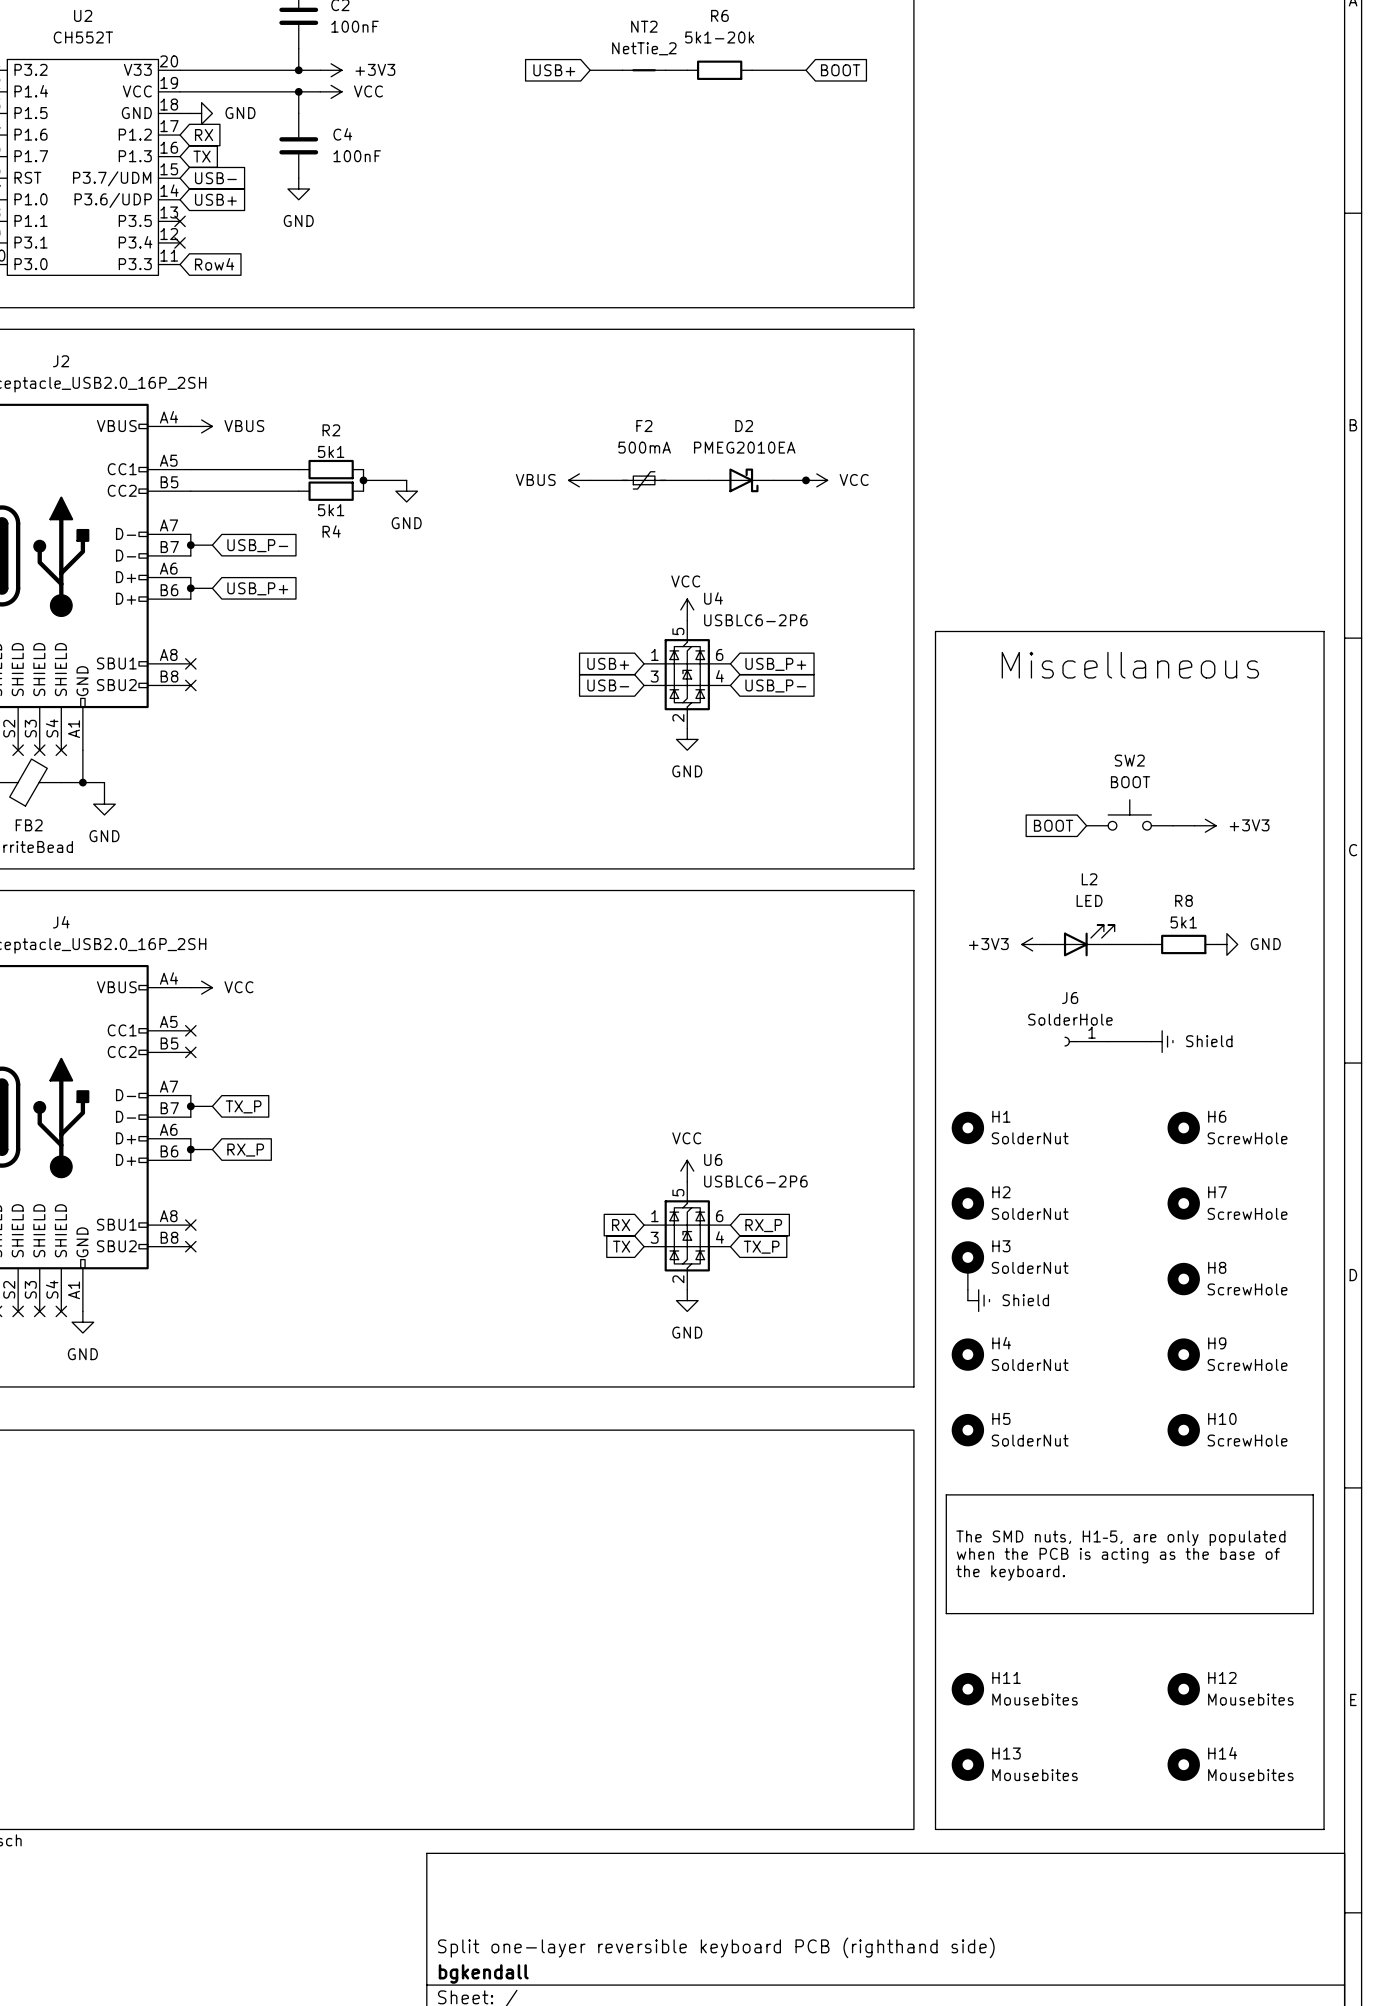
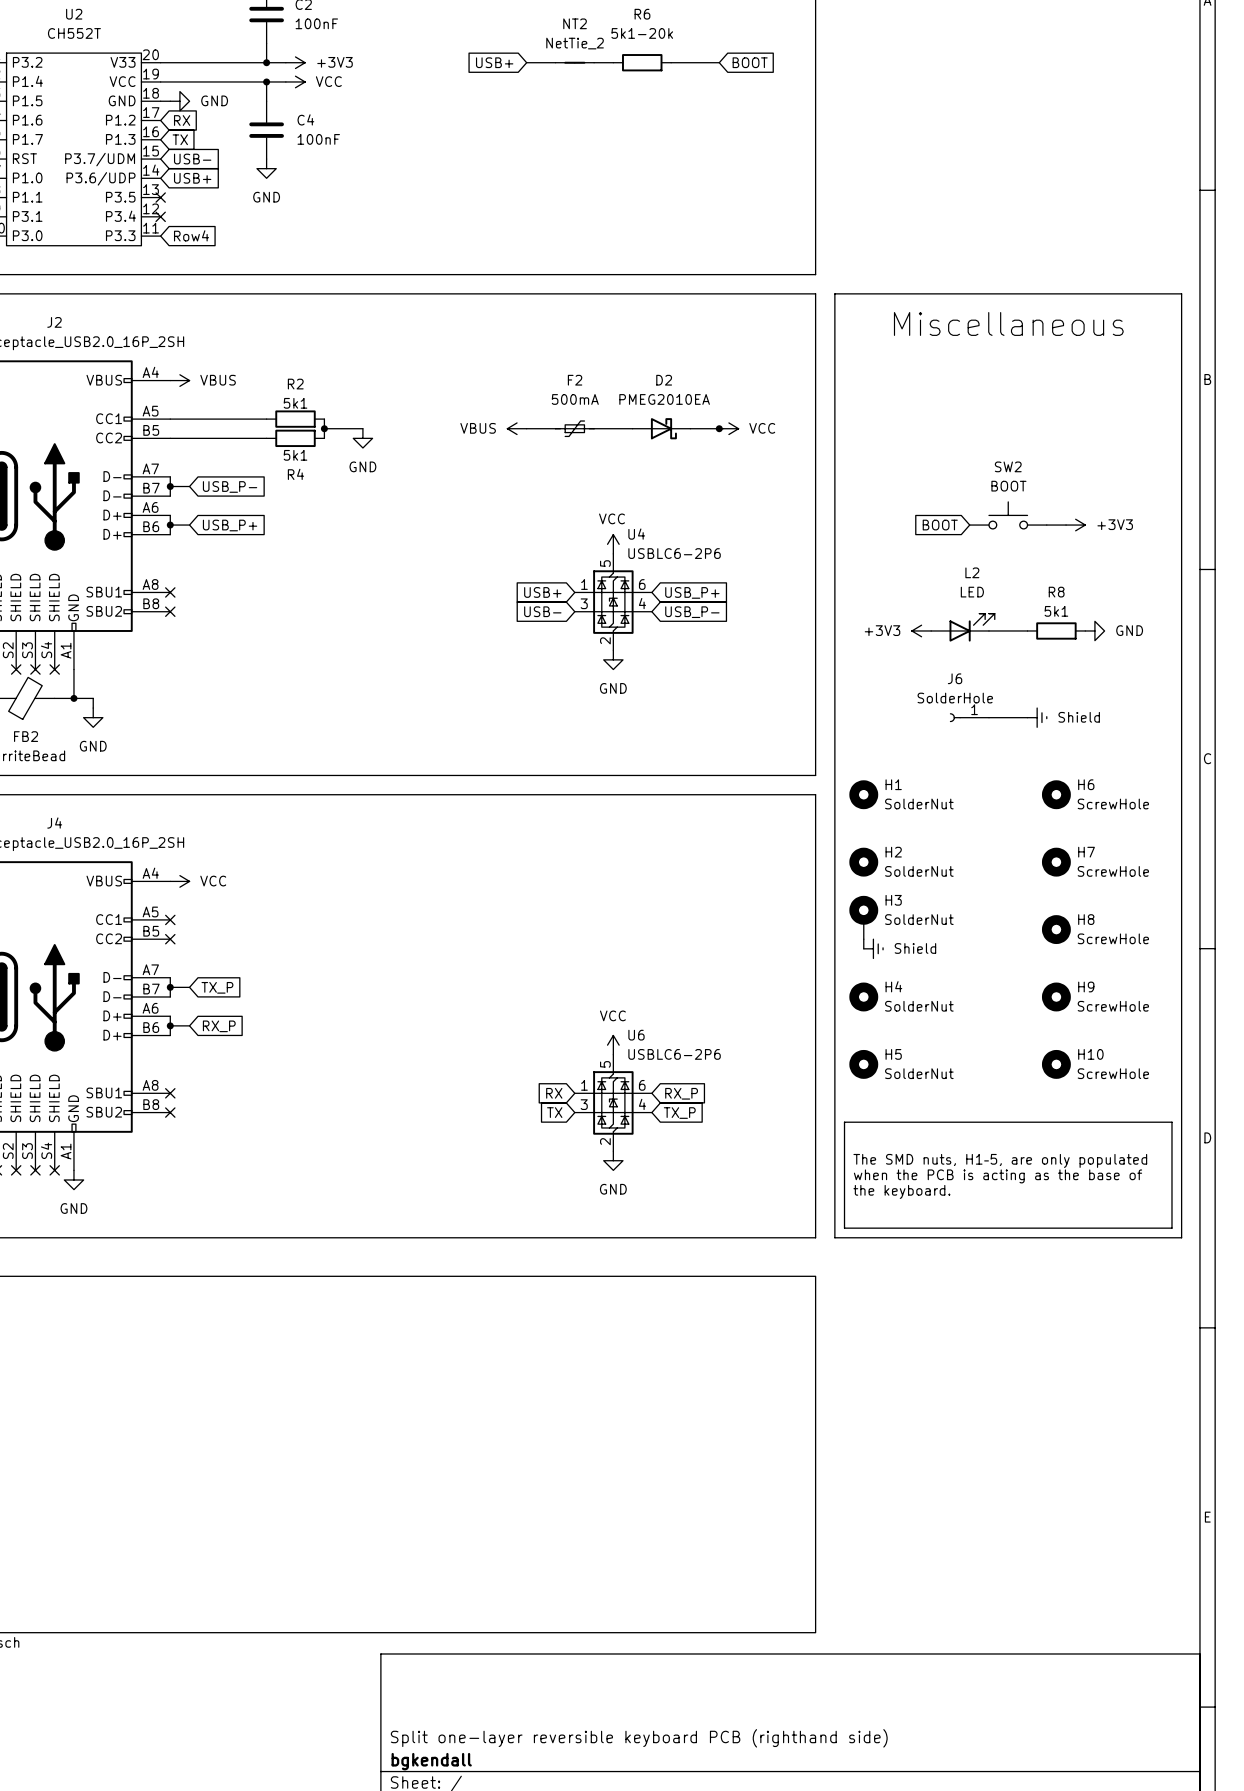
text: none -> Miscellaneous (1008, 323)
global label: none -> BOOT (940, 525)
wire: none -> (1046, 525) (1066, 525)
power symbol: none -> +3V3 (1075, 525)
line: (935, 631) (1324, 631) -> (834, 563) (834, 293) (1181, 293) (1181, 563)
text: Miscellaneous (1130, 665) -> none
power symbol: none -> +3V3 (921, 630)
wire: none -> (988, 630) (1027, 630)
power symbol: none -> GND (1094, 630)
power symbol: none -> Shield (1037, 717)
SW2 position: (1129, 814) -> (1008, 515)
global label: BOOT (1053, 825) -> none
wire: (1172, 825) (1194, 825) -> none
power symbol: +3V3 (1205, 825) -> none
L2 position: (1079, 940) -> (962, 627)
power symbol: +3V3 (1032, 944) -> none
wire: (1108, 944) (1151, 944) -> (988, 717) (1027, 717)
R8 position: (1183, 944) -> (1056, 630)
power symbol: GND (1226, 944) -> none
J6 position: (1086, 1041) -> (969, 717)
wire: (1108, 1041) (1151, 1041) -> none
power symbol: Shield (1162, 1041) -> none
wire: none -> (863, 939) (863, 948)
power symbol: none -> Shield (873, 948)
H1 position: (967, 1127) -> (863, 794)
H6 position: (1183, 1127) -> (1056, 794)
H2 position: (967, 1203) -> (863, 862)
H7 position: (1183, 1203) -> (1056, 862)
line: none -> (844, 1122) (1171, 1122) (1171, 1228) (844, 1228) (844, 1122)
H3 position: (967, 1265) -> (863, 917)
H8 position: (1183, 1279) -> (1056, 929)
wire: (967, 1289) (967, 1300) -> none
power symbol: Shield (978, 1300) -> none
text: none -> The SMD nuts, H1–5, are only populated (1000, 1160)
text: none -> when the PCB is acting as the base of (998, 1176)
text: none -> the keyboard. (901, 1191)
H4 position: (967, 1354) -> (863, 996)
H9 position: (1183, 1354) -> (1056, 996)
line: (935, 1386) (935, 1829) (1324, 1829) (1324, 1386) -> (834, 1237) (1181, 1237)
H5 position: (967, 1430) -> (863, 1064)
H10 position: (1183, 1430) -> (1056, 1064)
line: (946, 1494) (1313, 1494) (1313, 1613) (946, 1613) (946, 1494) -> none
text: The SMD nuts, H1–5, are only populated (1120, 1538) -> none
text: when the PCB is acting as the base of (1118, 1555) -> none
text: the keyboard. (1010, 1573) -> none
H11: Mousebites (967, 1689) -> none
H12: Mousebites (1183, 1689) -> none
H13: Mousebites (967, 1764) -> none
H14: Mousebites (1183, 1764) -> none

